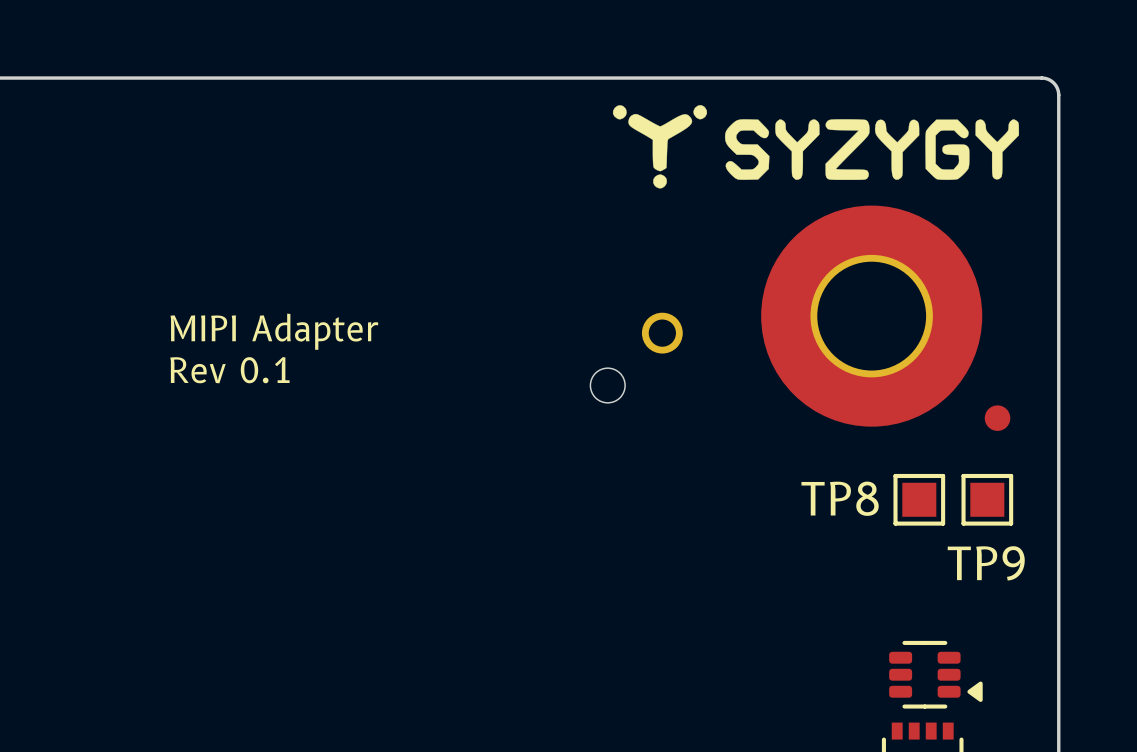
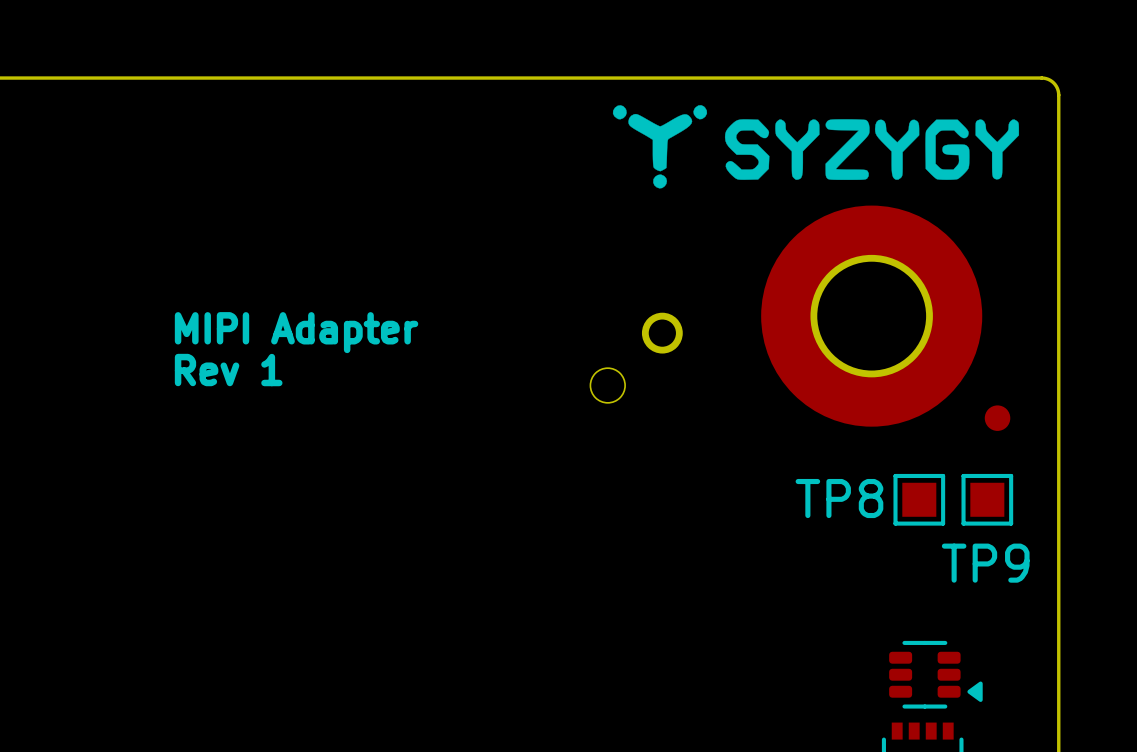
text: Rev 0.1 (229, 370) -> Rev 1 (228, 370)

